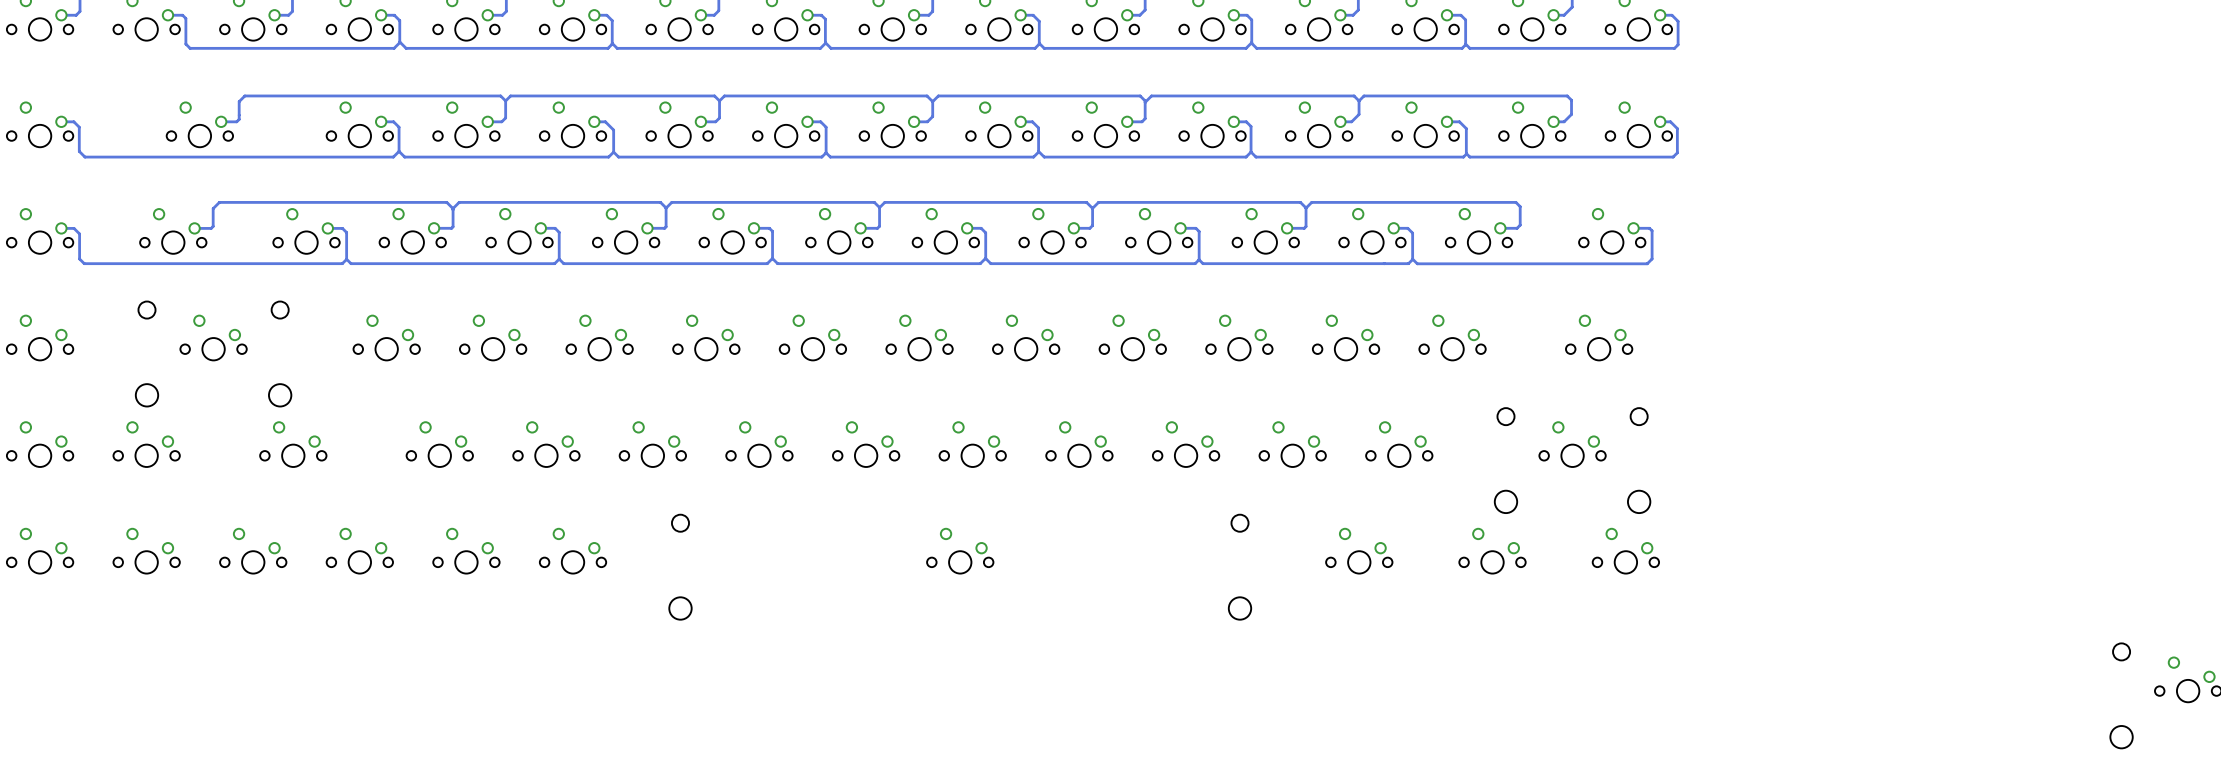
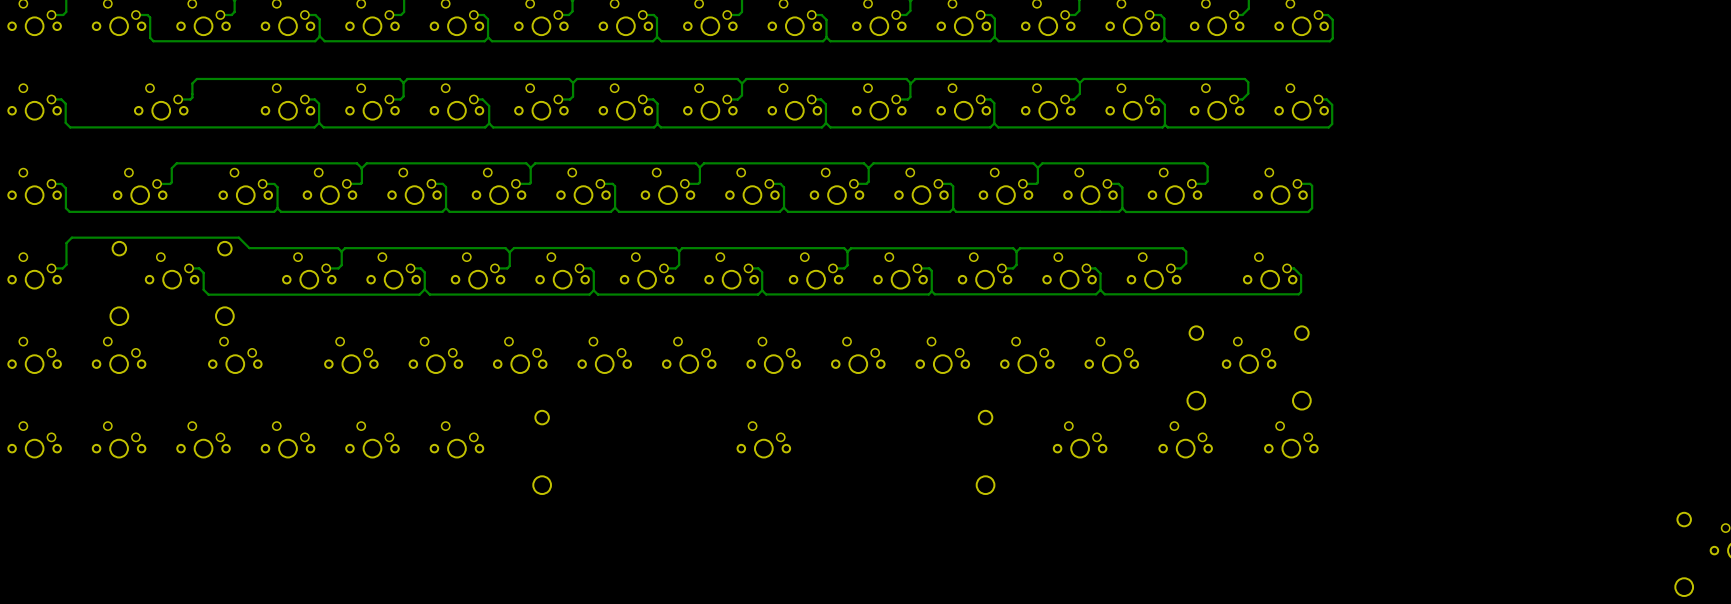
track: none -> (341, 251) (338, 248) (249, 248) (238, 237) (71, 237) (66, 243) (66, 264) (62, 268) (51, 268)
track: none -> (341, 251) (341, 265) (338, 268) (326, 268)
track: none -> (341, 251) (345, 248) (505, 248) (509, 252)
track: none -> (679, 251) (675, 248) (514, 248) (509, 252)
track: none -> (679, 251) (679, 264) (675, 268) (663, 268)
track: none -> (679, 251) (682, 248) (844, 248) (847, 251) (847, 265) (844, 268) (832, 268)
track: none -> (1016, 251) (1020, 248) (1182, 248) (1186, 251) (1186, 263) (1181, 268) (1170, 268)
track: none -> (509, 252) (509, 265) (507, 268) (494, 268)
track: none -> (847, 251) (851, 248) (1013, 248) (1016, 251) (1016, 264) (1013, 268) (1001, 268)
track: none -> (189, 268) (199, 268) (203, 272) (203, 289) (208, 294) (419, 294) (424, 289)
track: none -> (410, 268) (420, 268) (424, 272) (424, 289)
track: none -> (579, 268) (590, 268) (593, 271) (593, 290)
track: none -> (748, 268) (758, 268) (762, 272) (762, 290)
track: none -> (917, 268) (929, 268) (931, 270) (931, 291) (928, 294) (766, 294) (762, 290)
track: none -> (1086, 268) (1095, 268) (1100, 273) (1100, 290)
track: none -> (1287, 268) (1293, 268) (1301, 275) (1301, 291) (1298, 294) (1104, 294) (1100, 290)
track: none -> (424, 289) (429, 294) (589, 294) (593, 290)
track: none -> (593, 290) (597, 294) (758, 294) (762, 290)
track: none -> (1100, 290) (1096, 294) (934, 294) (931, 291)

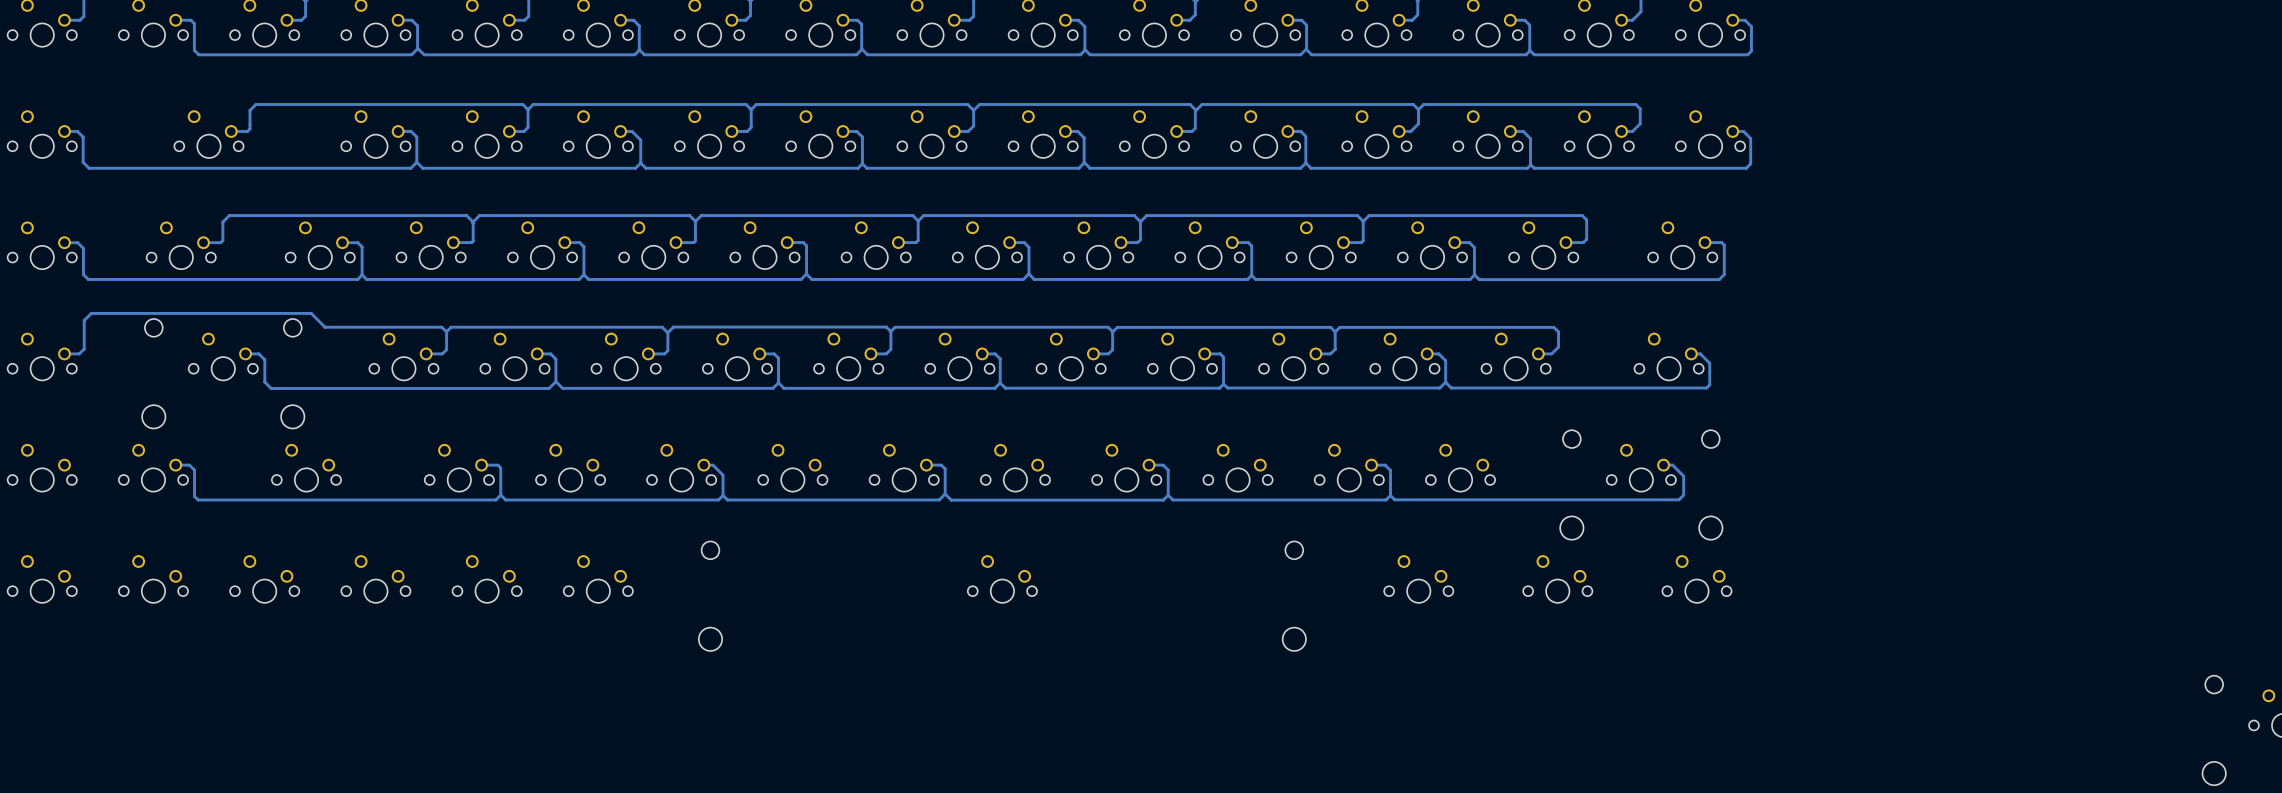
track: none -> (175, 465) (189, 465) (194, 470) (194, 496) (198, 499) (495, 499) (500, 495)
track: none -> (481, 465) (497, 465) (500, 467) (500, 495)
track: none -> (703, 465) (712, 465) (723, 475) (723, 495)
track: none -> (926, 465) (941, 465) (945, 468) (945, 494)
track: none -> (1149, 465) (1163, 465) (1168, 470) (1168, 495)
track: none -> (1371, 465) (1385, 465) (1390, 470) (1390, 495)
track: none -> (1663, 465) (1672, 465) (1683, 476) (1683, 495) (1678, 499) (1394, 499) (1390, 495)
track: none -> (945, 494) (939, 499) (727, 499) (723, 495)
track: none -> (945, 494) (951, 500) (1163, 500) (1168, 495)
track: none -> (500, 495) (505, 499) (718, 499) (723, 495)
track: none -> (1168, 495) (1172, 499) (1386, 499) (1390, 495)

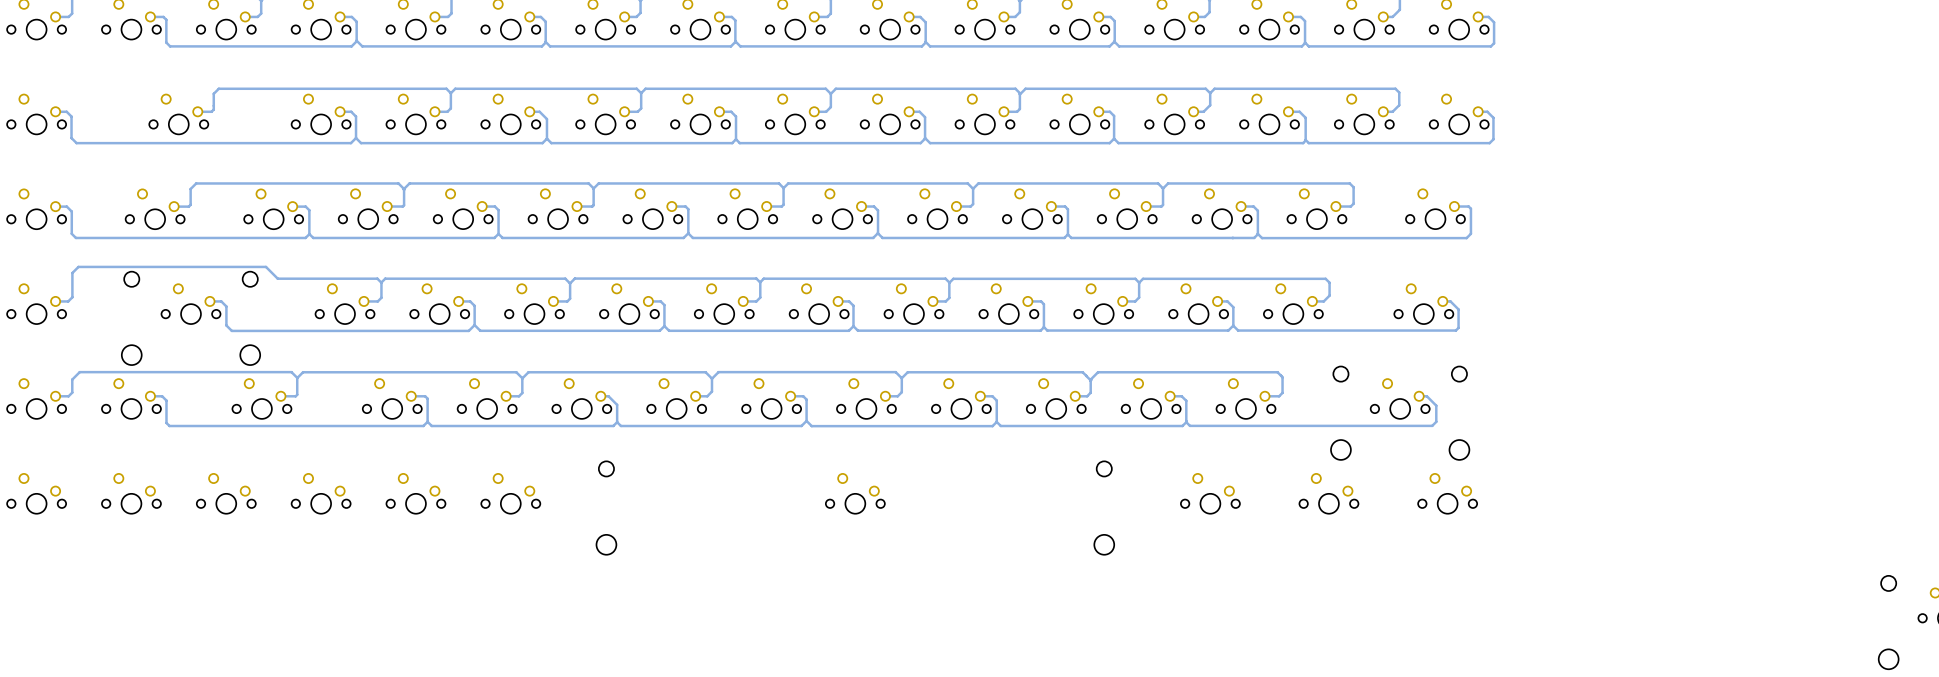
track: none -> (297, 378) (303, 372) (516, 372) (522, 378) (522, 393) (519, 396) (506, 396)
track: none -> (901, 378) (895, 372) (718, 372) (711, 378)
track: none -> (901, 378) (901, 392) (897, 396) (885, 396)
track: none -> (901, 378) (907, 372) (1082, 372) (1090, 380) (1090, 392) (1087, 396) (1075, 396)
track: none -> (522, 378) (528, 372) (705, 372) (711, 378) (711, 391) (707, 396) (695, 396)
track: none -> (1090, 380) (1098, 372) (1277, 372) (1282, 377) (1282, 392) (1279, 396) (1264, 396)
track: none -> (280, 396) (297, 394) (297, 377) (291, 372) (79, 372) (72, 379) (72, 392) (68, 396) (55, 396)

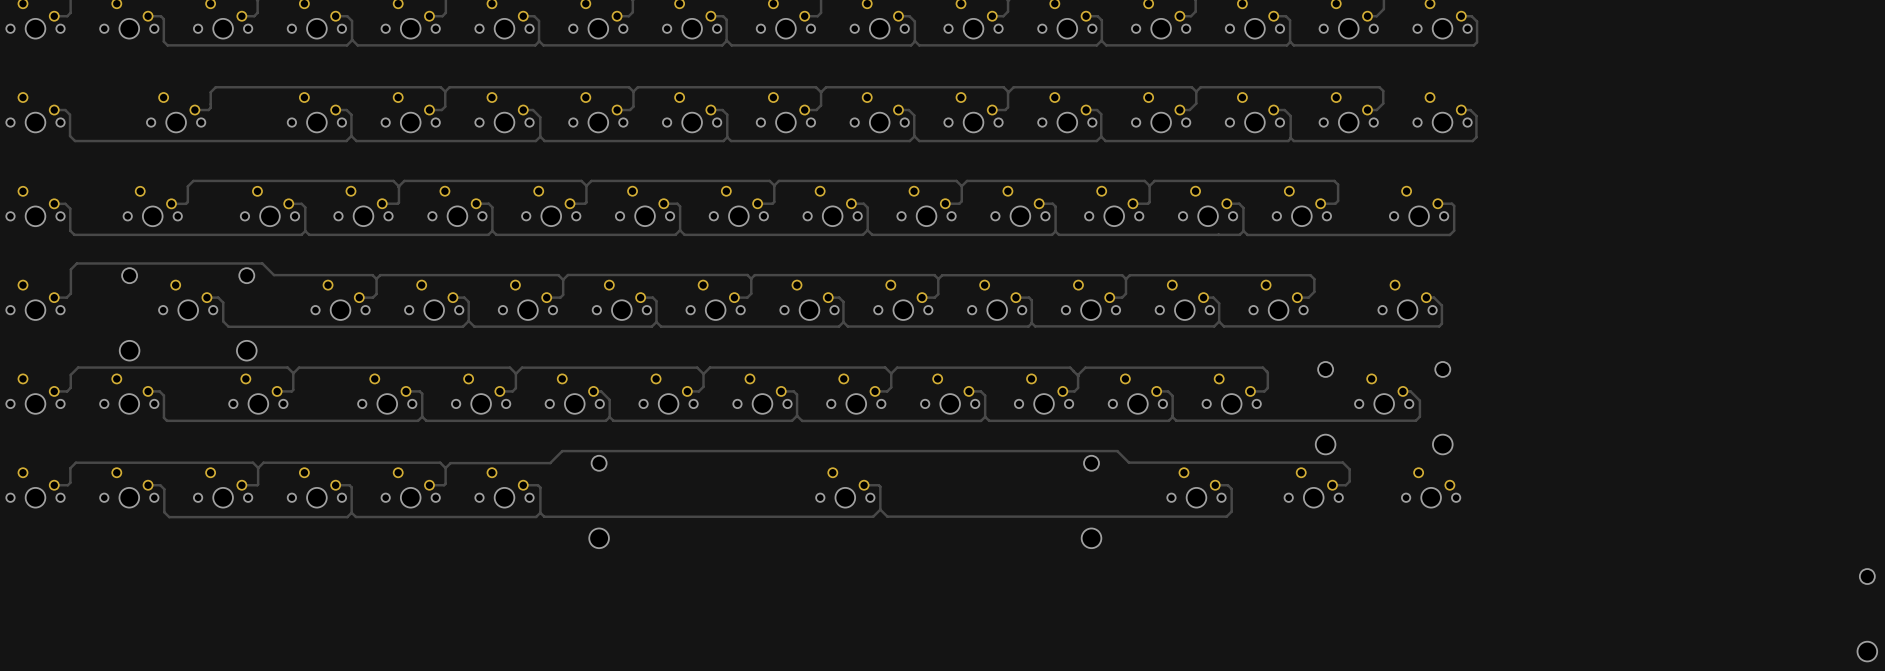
track: none -> (445, 468) (440, 462) (263, 462) (258, 468)
track: none -> (445, 468) (450, 463) (550, 463) (562, 451) (1117, 451) (1128, 462) (1342, 462) (1349, 469) (1349, 481) (1345, 485) (1332, 485)
track: none -> (445, 468) (445, 483) (429, 485)
track: none -> (148, 485) (160, 485) (164, 489) (164, 512) (169, 517) (347, 517) (351, 512)
track: none -> (241, 485) (258, 484) (258, 467) (253, 462) (75, 462) (70, 468) (70, 482) (67, 485) (54, 485)
track: none -> (335, 485) (349, 485) (351, 487) (351, 512)
track: none -> (523, 485) (538, 485) (540, 487) (540, 512)
track: none -> (864, 485) (880, 486) (880, 509)
track: none -> (1215, 485) (1227, 485) (1231, 488) (1231, 511) (1226, 516) (887, 516) (880, 509)
track: none -> (880, 509) (873, 516) (544, 516) (540, 512)
track: none -> (351, 512) (355, 517) (536, 517) (540, 512)

